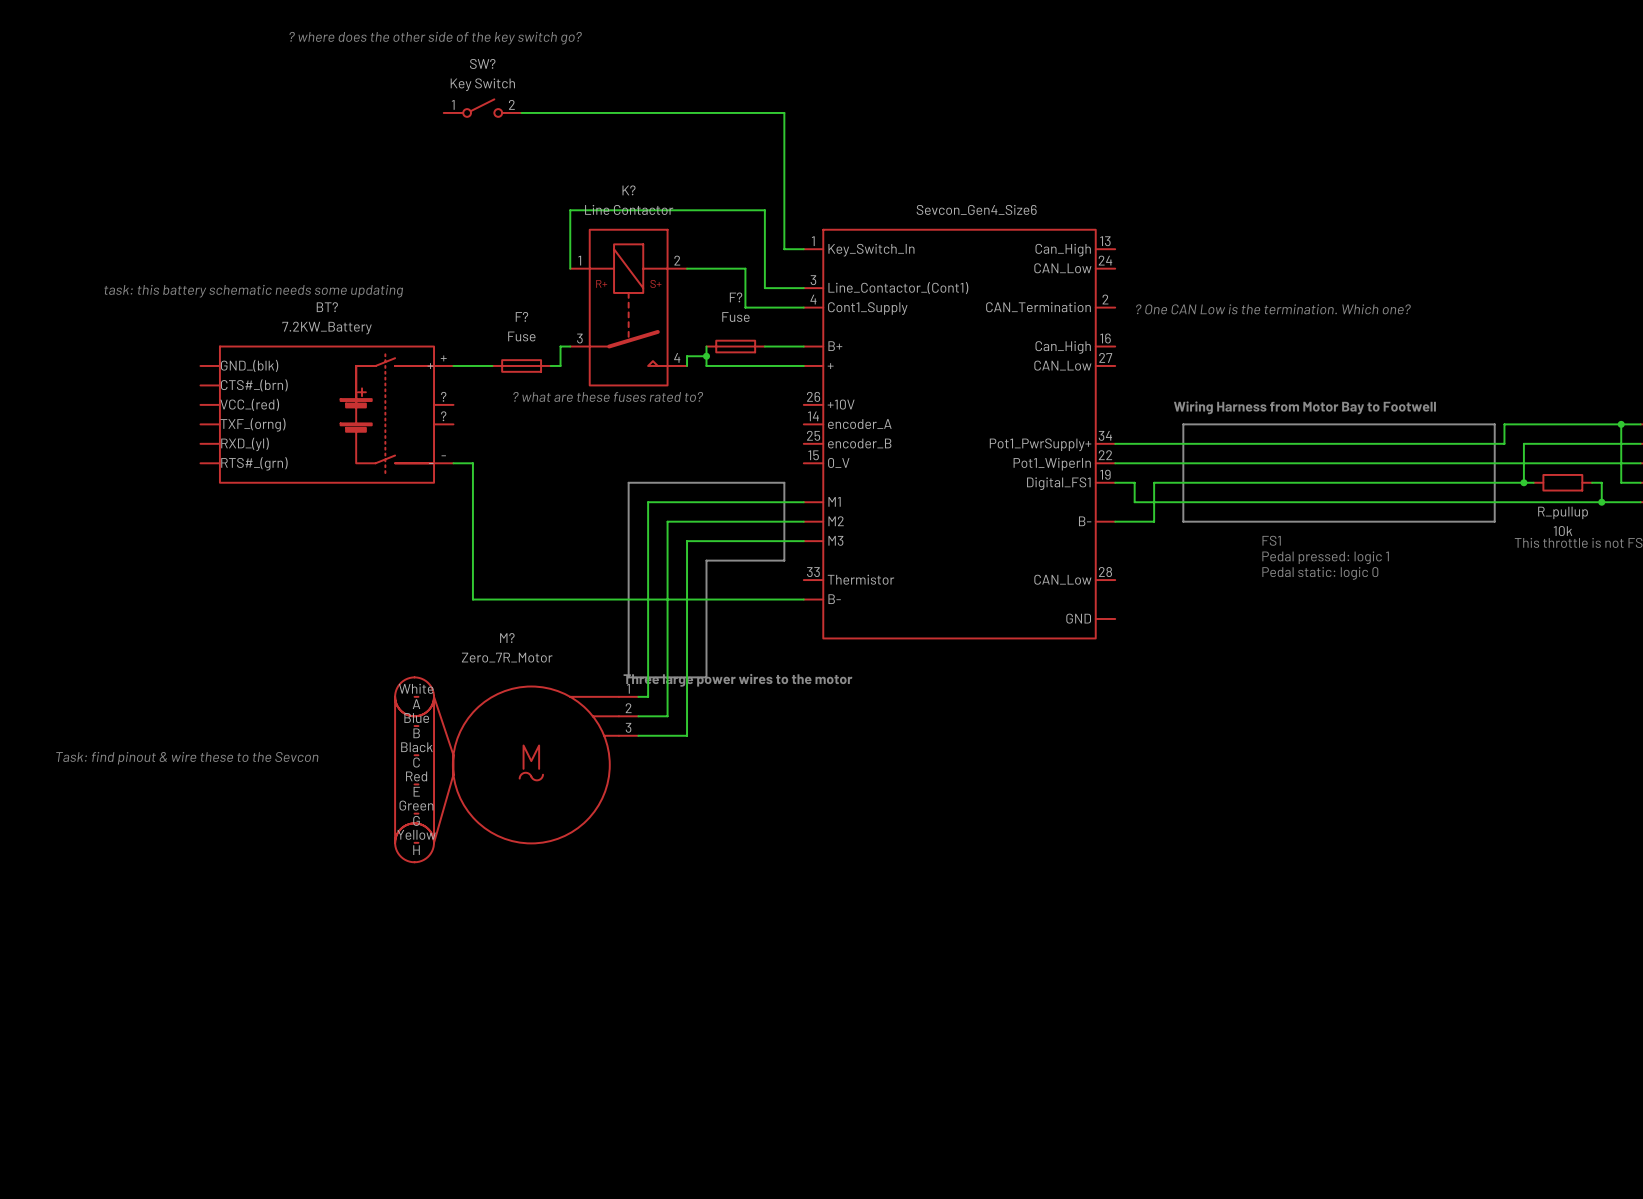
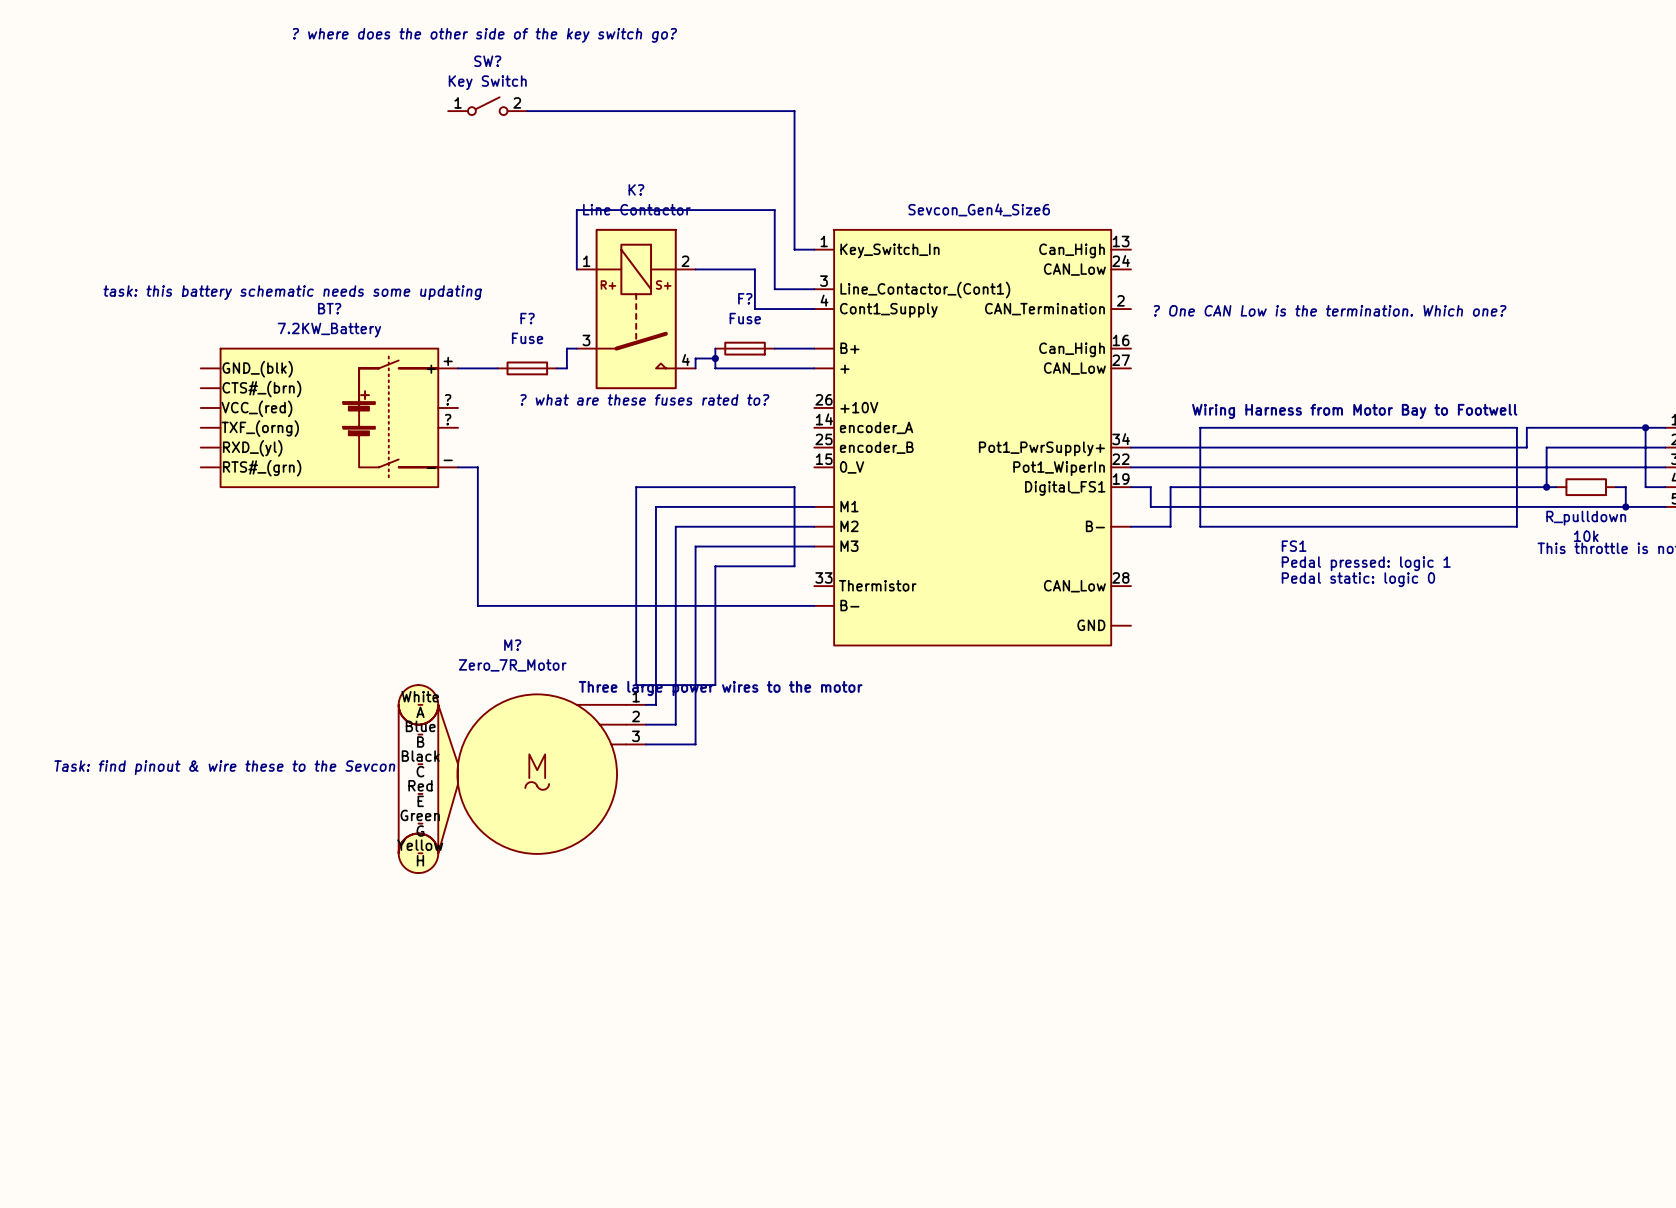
R_pullup name: R_pullup (1563, 512) -> R_pulldown (1586, 518)

